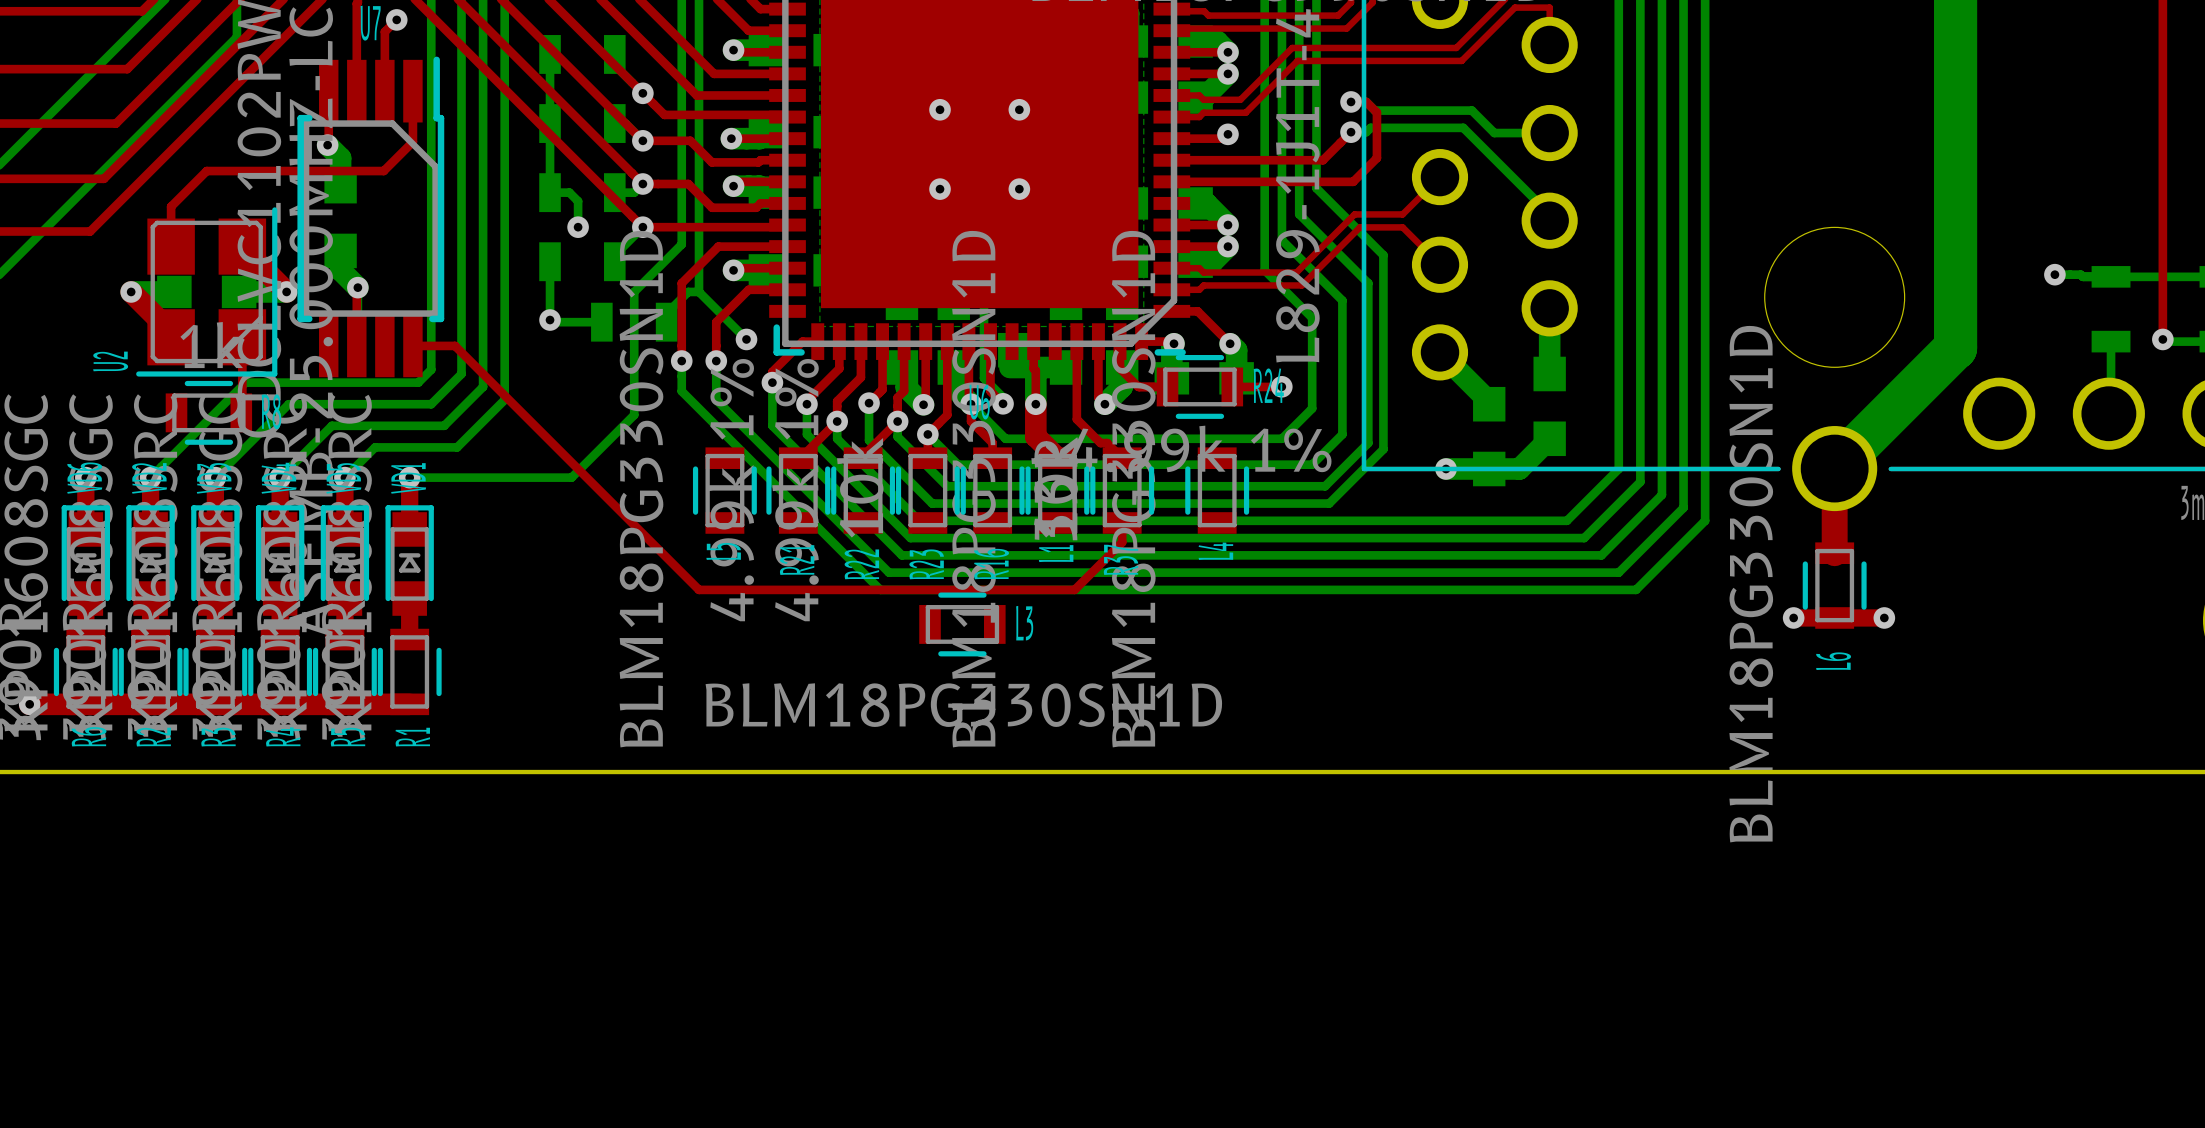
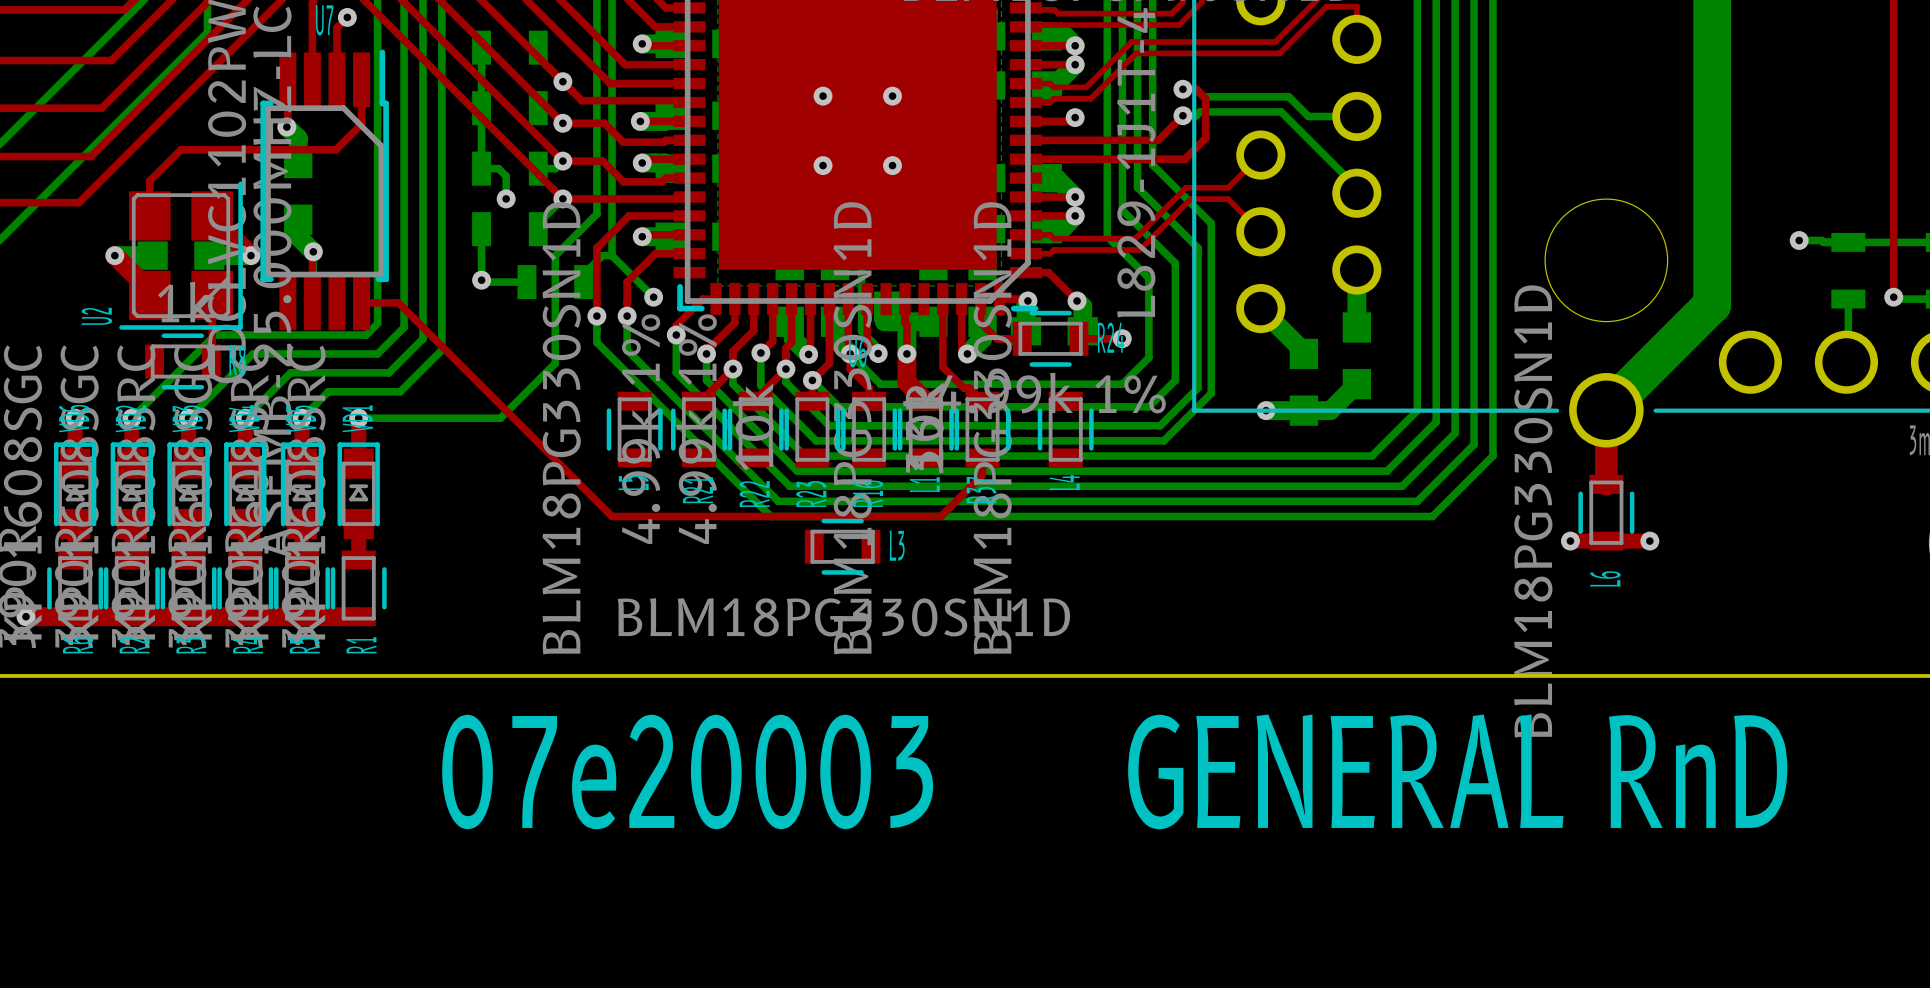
text: none -> 07e20003 (687, 771)
text: none -> GENERAL RnD (1457, 771)

